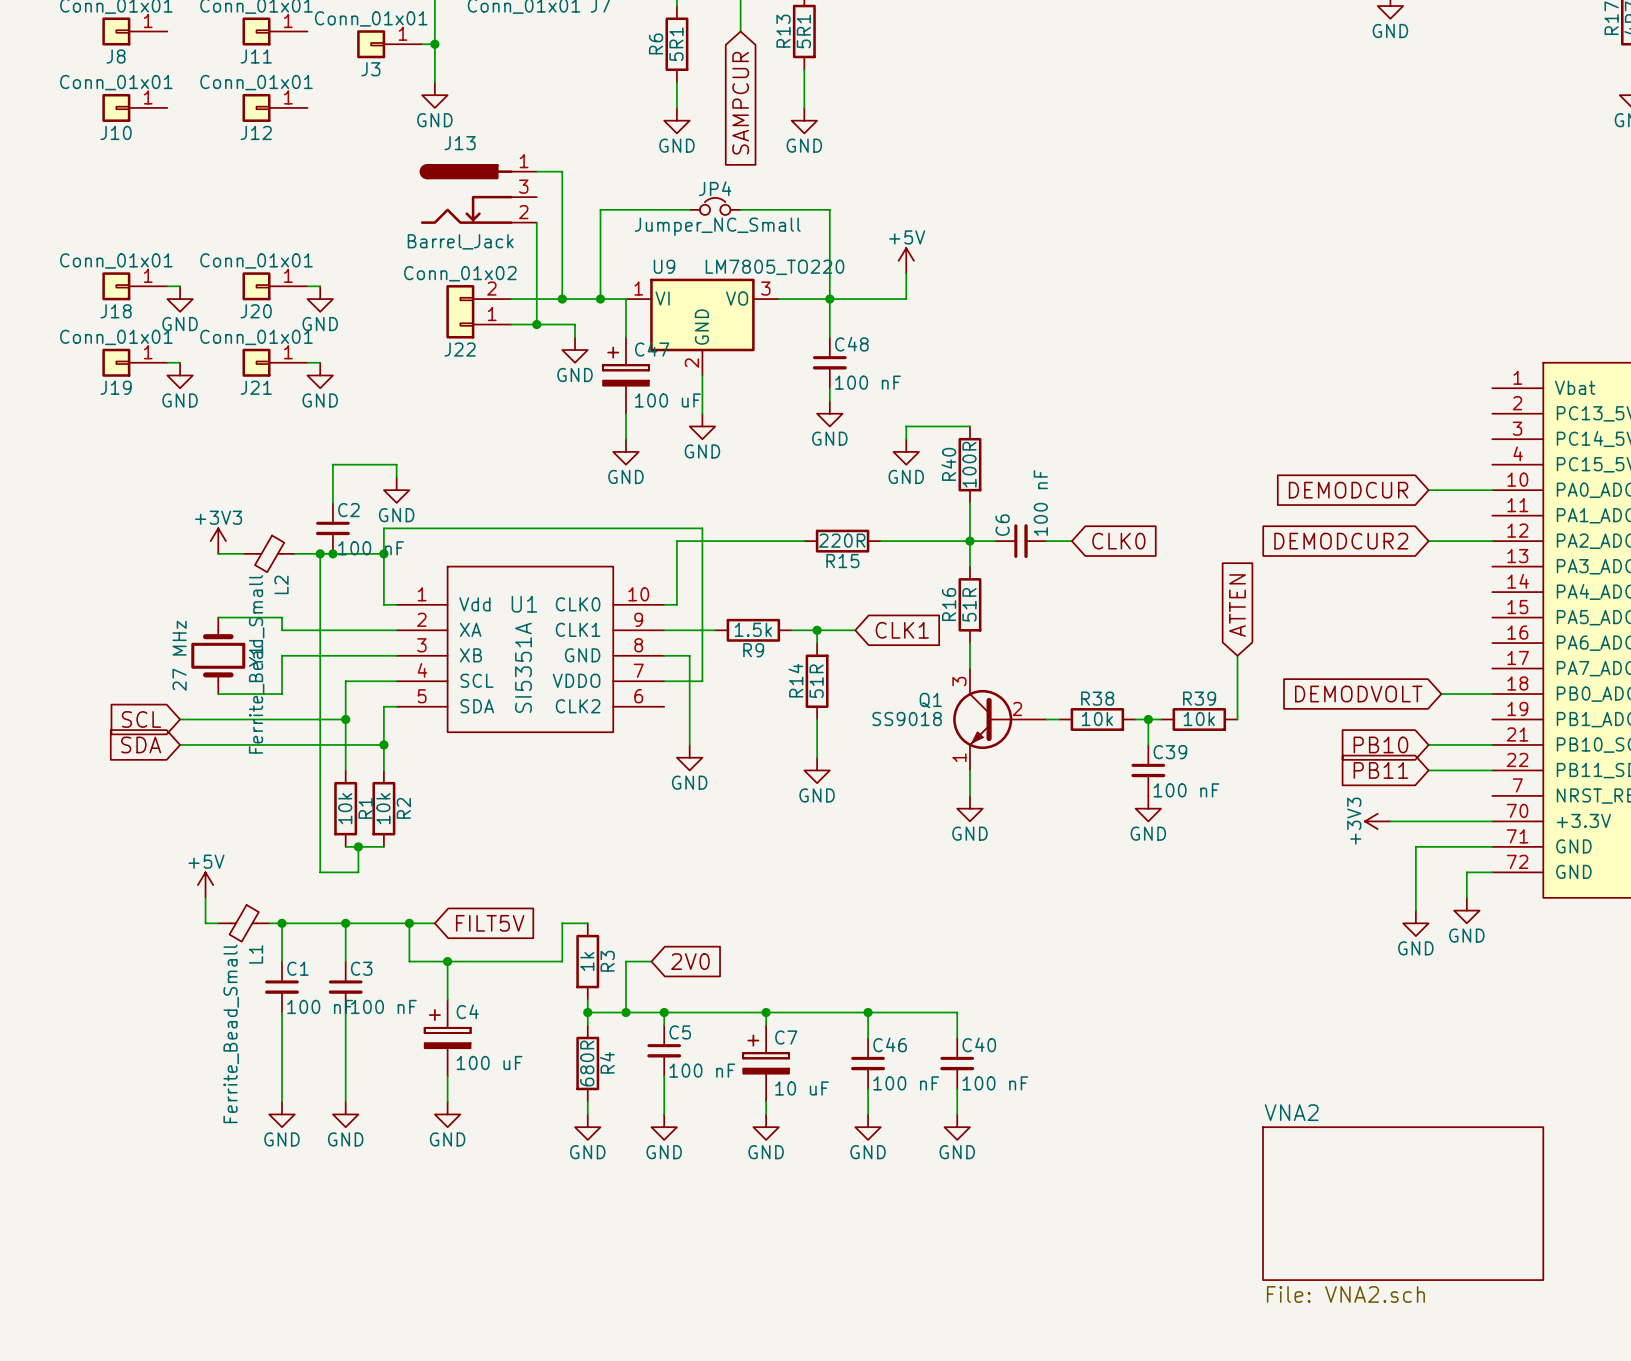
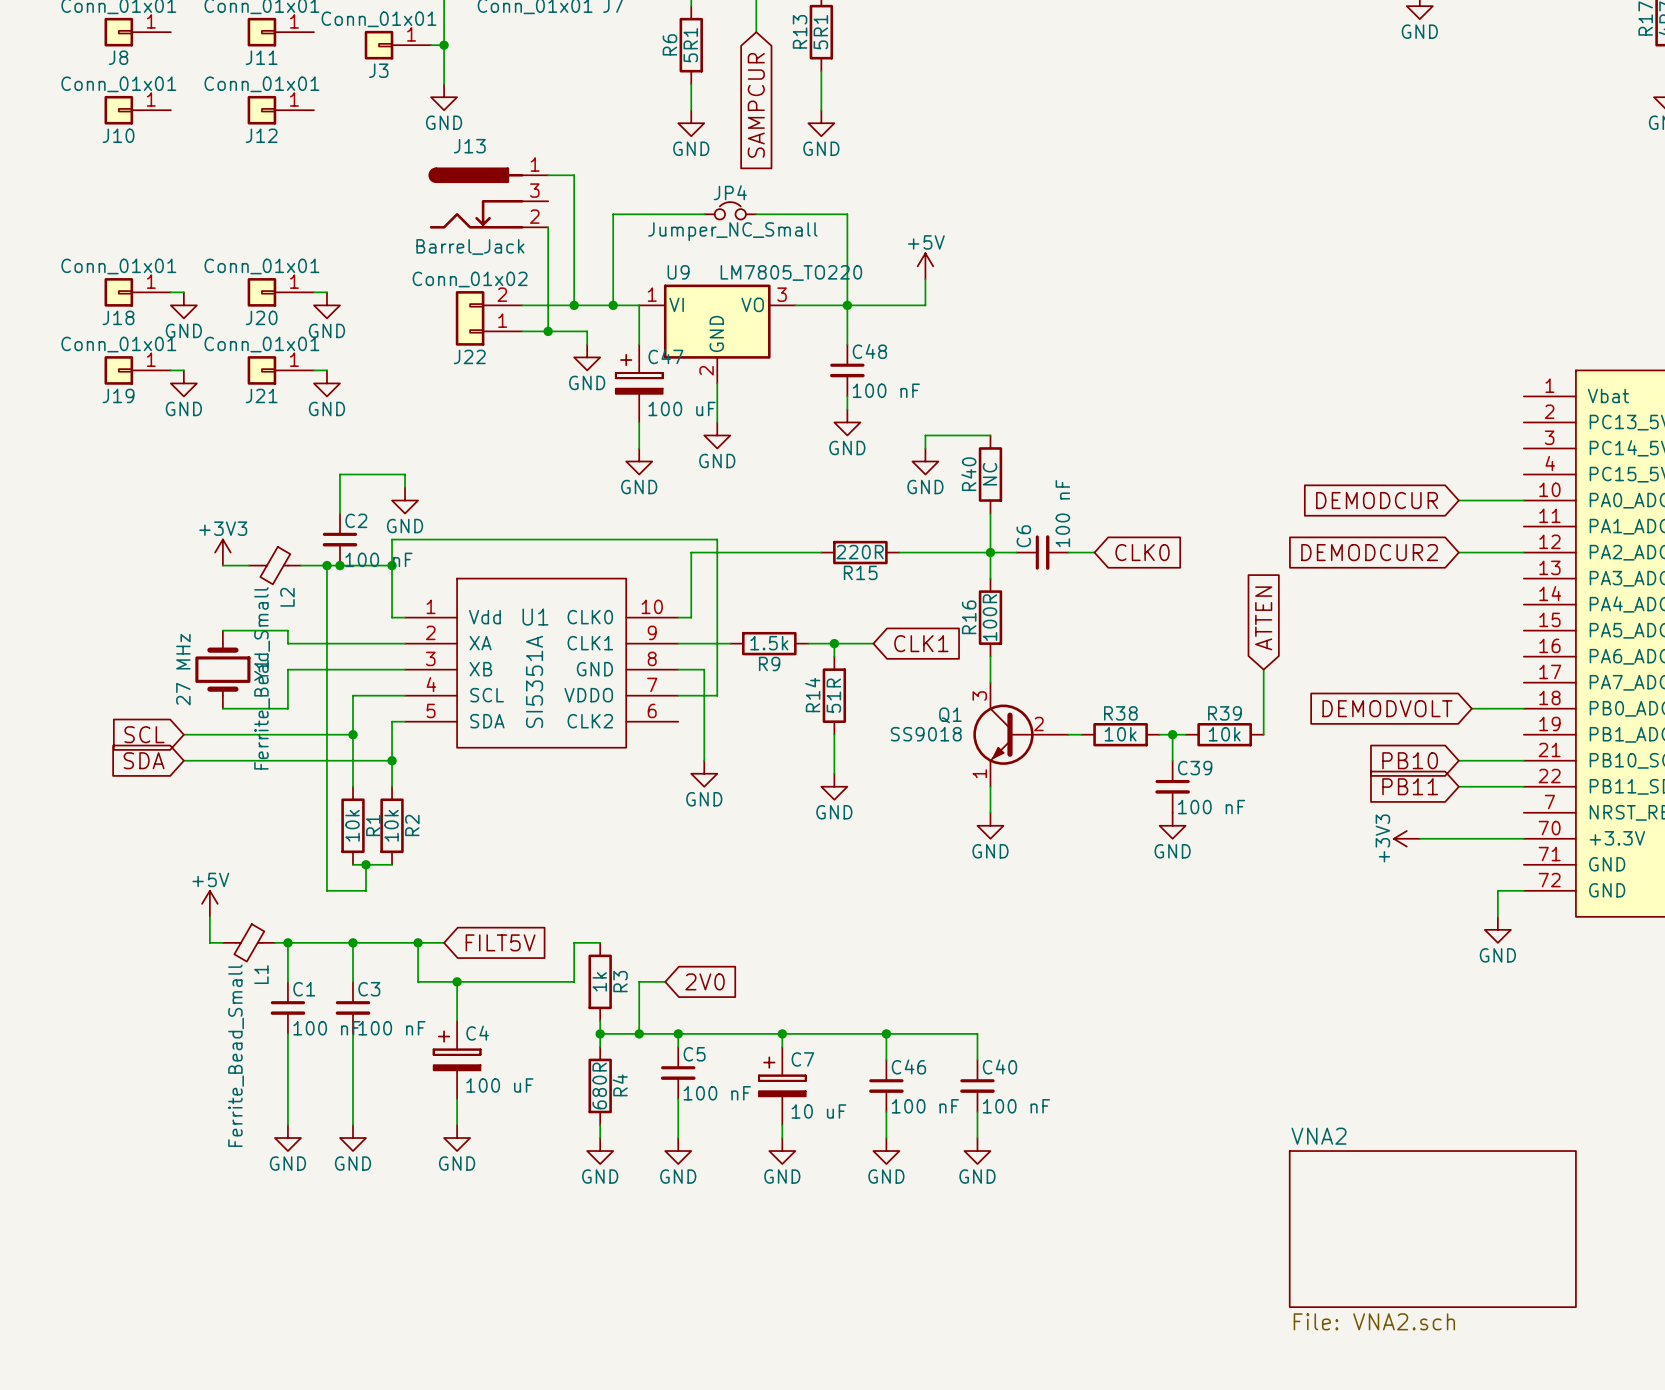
R40 value: 100R (969, 464) -> NC (989, 474)
R16 value: 51R (969, 604) -> 100R (989, 617)
wire: (1492, 846) (1415, 846) (1415, 910) -> none
power symbol: GND (1415, 923) -> none

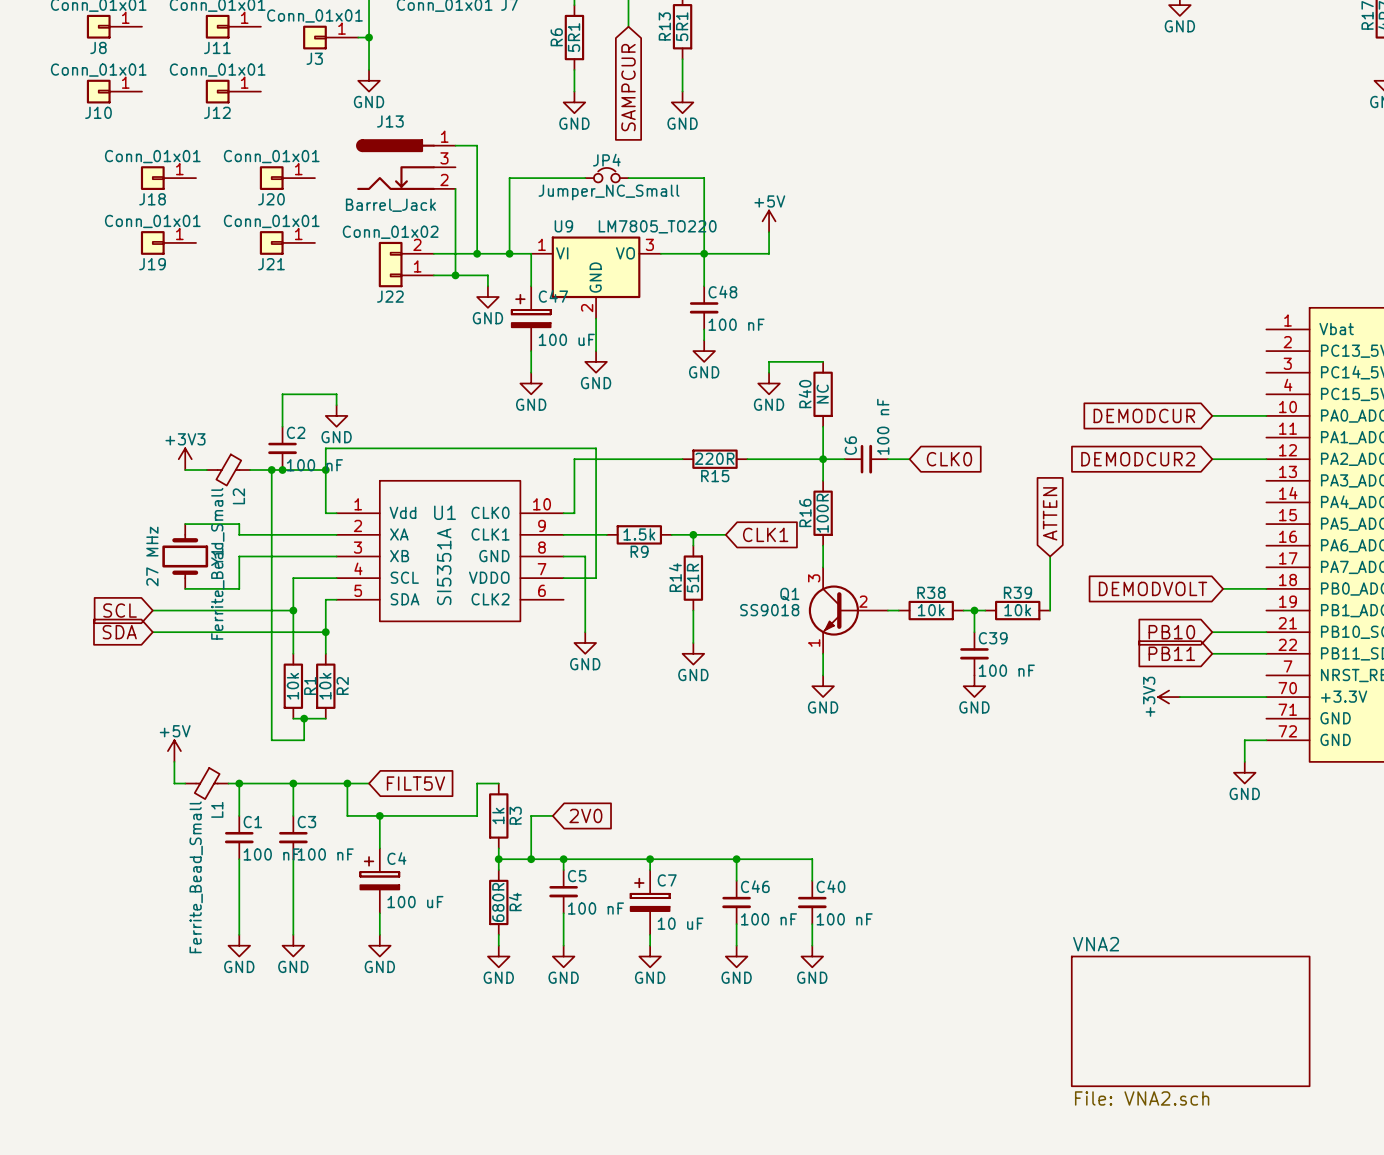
J18 position: (137, 292) -> (168, 178)
J20 position: (280, 292) -> (287, 178)
power symbol: GND (183, 305) -> none
power symbol: GND (326, 305) -> none
J19 position: (137, 370) -> (168, 242)
wire: (170, 370) (183, 370) -> none
J21 position: (280, 370) -> (287, 242)
wire: (313, 370) (326, 370) -> none
power symbol: GND (183, 383) -> none
power symbol: GND (326, 383) -> none

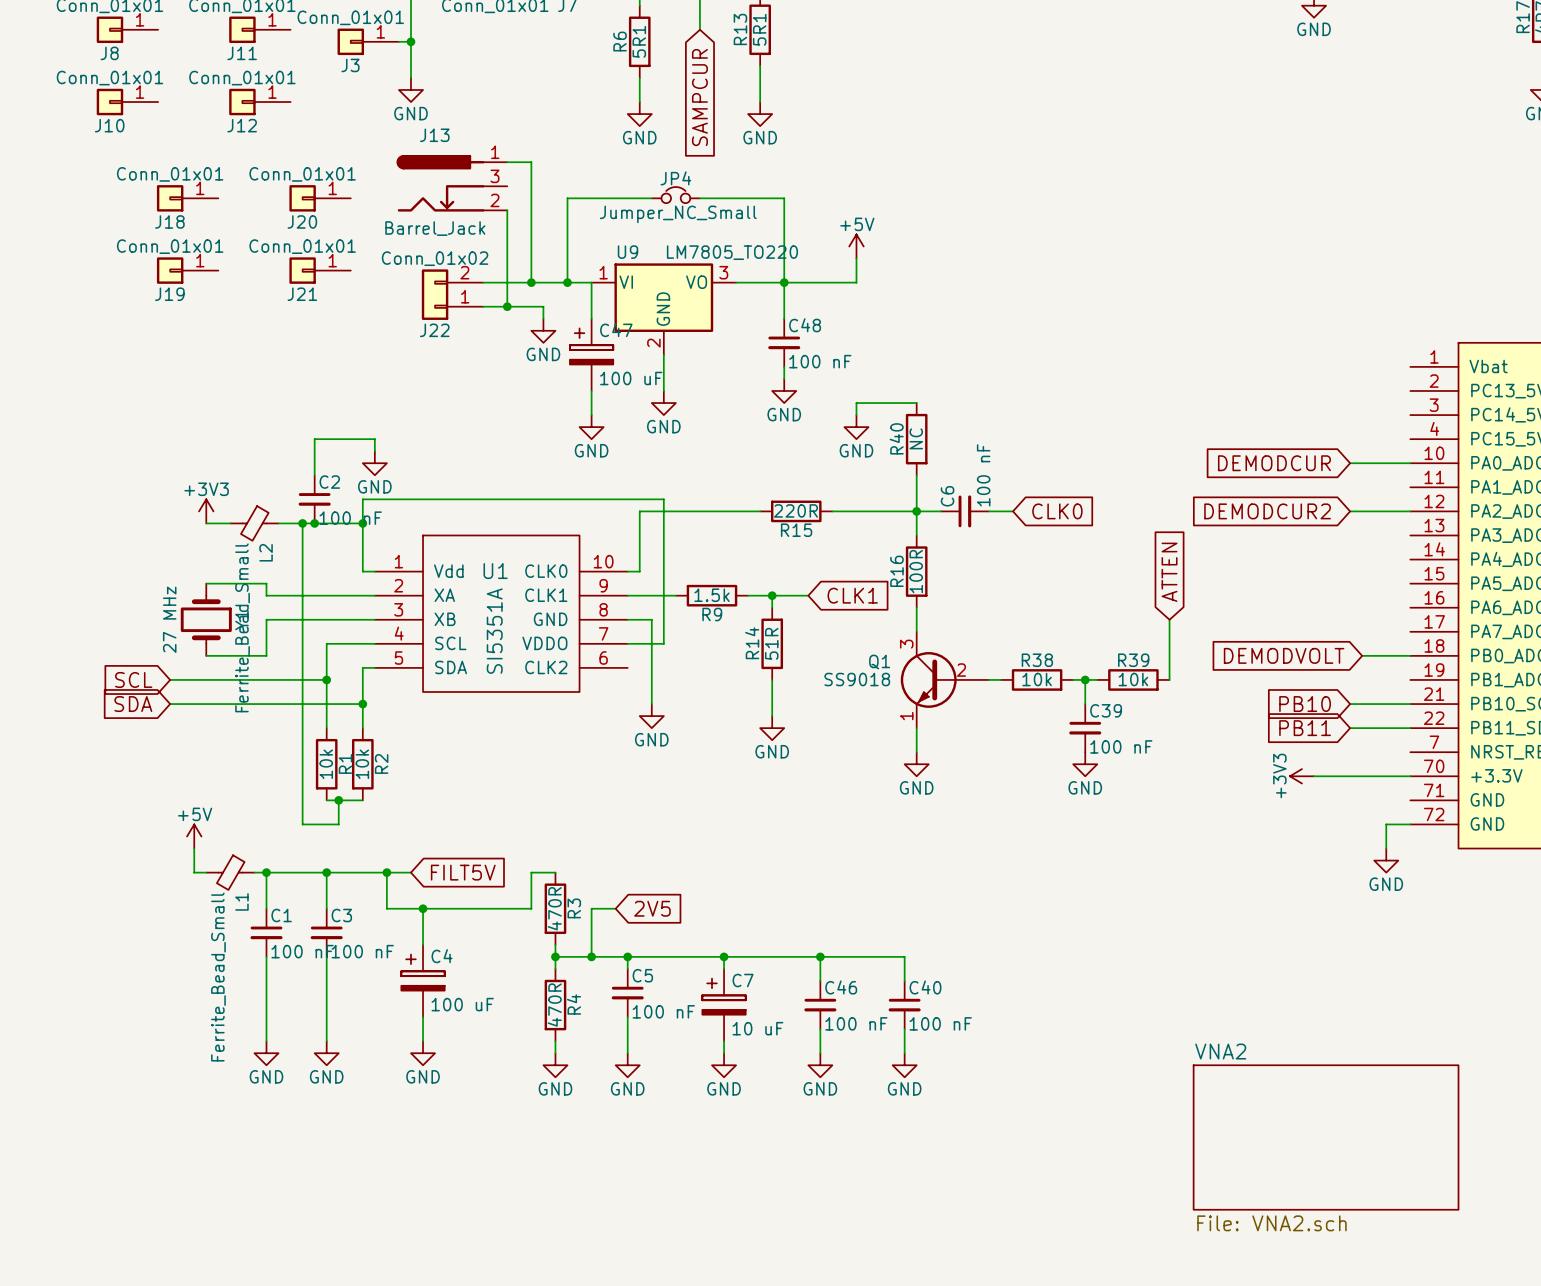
R3 value: 1k (498, 815) -> 470R (554, 908)
global label: 2V0 (585, 815) -> 2V5 (652, 908)
R4 value: 680R (498, 902) -> 470R (554, 1005)

